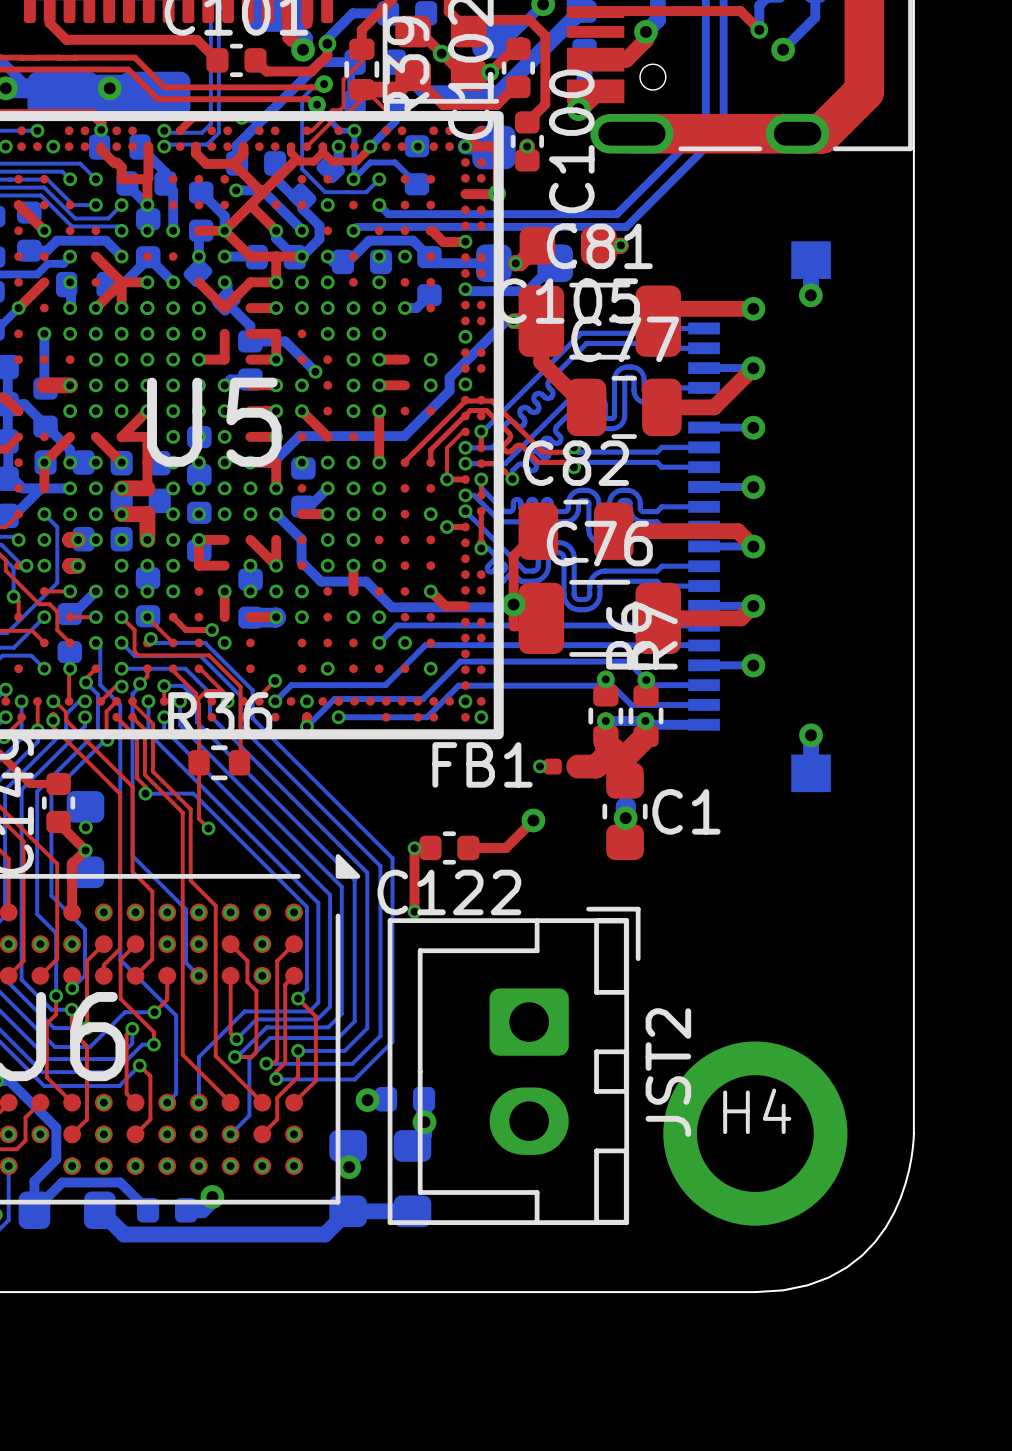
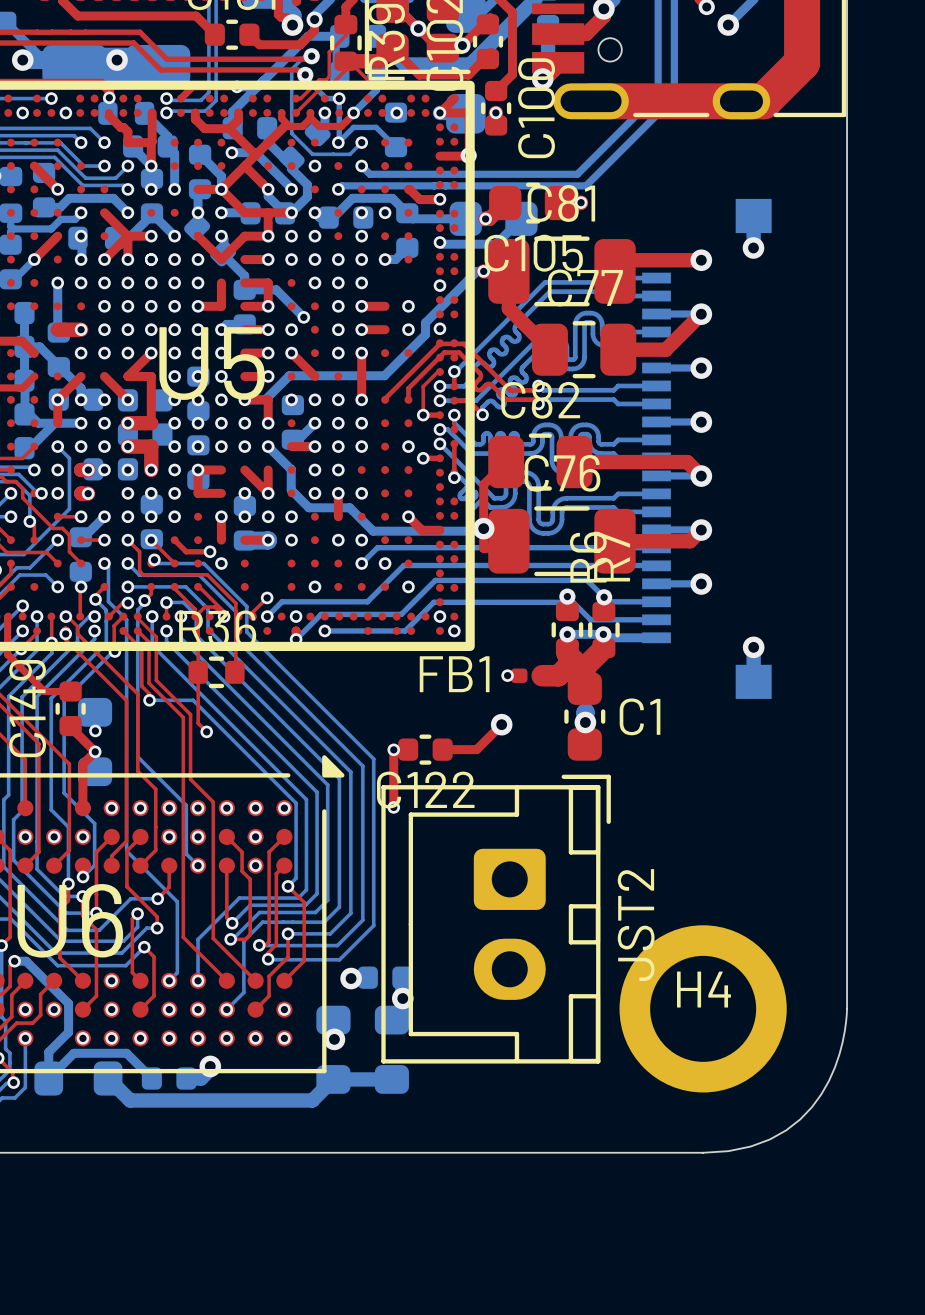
JST2 position: (514, 1065) -> (496, 919)

